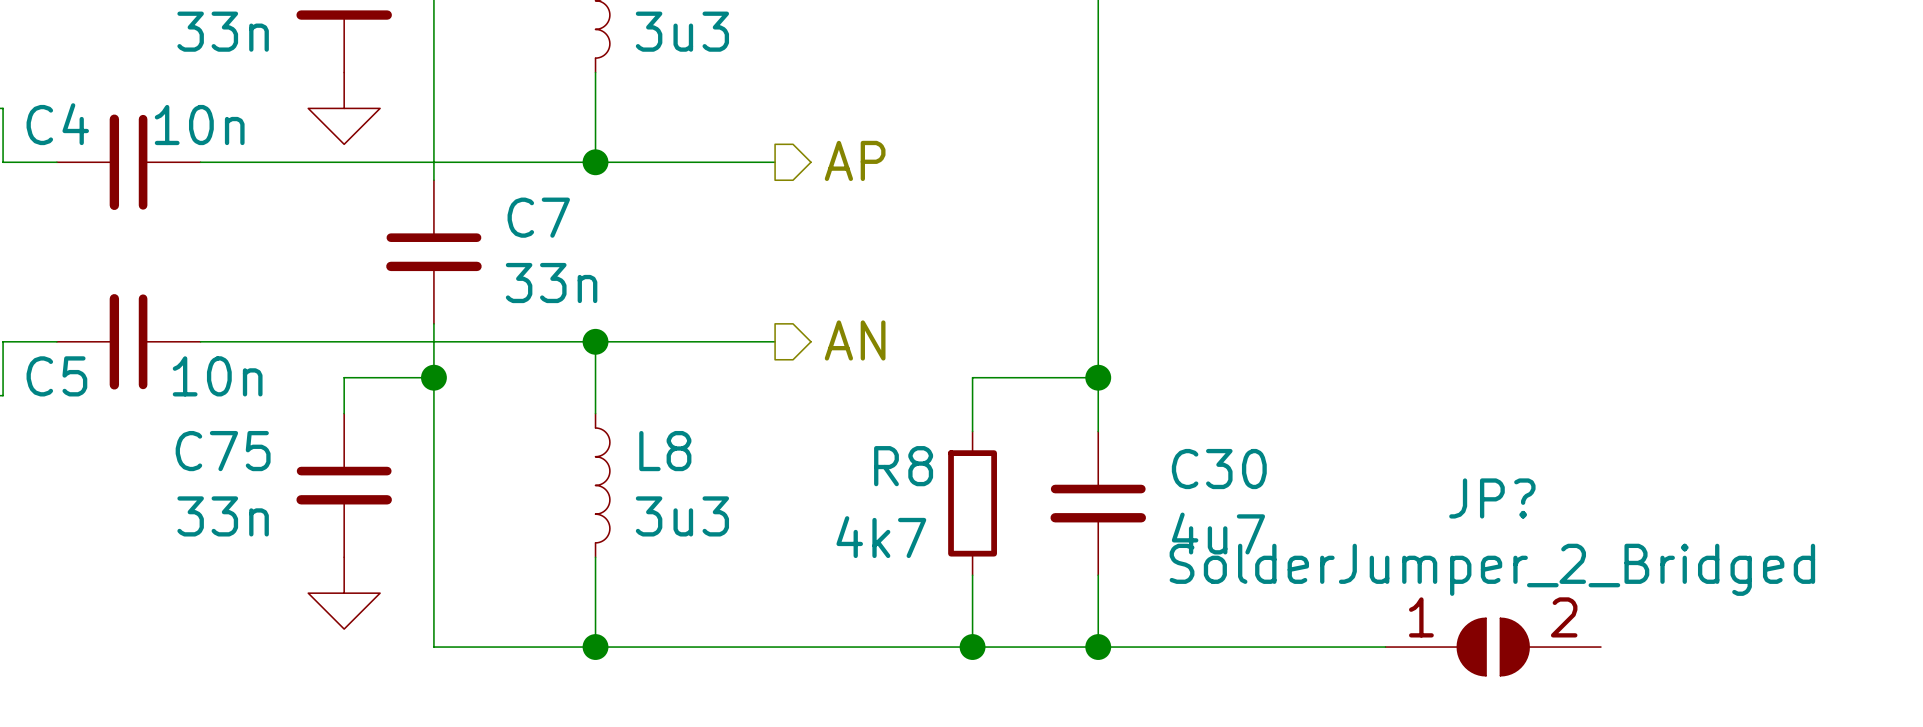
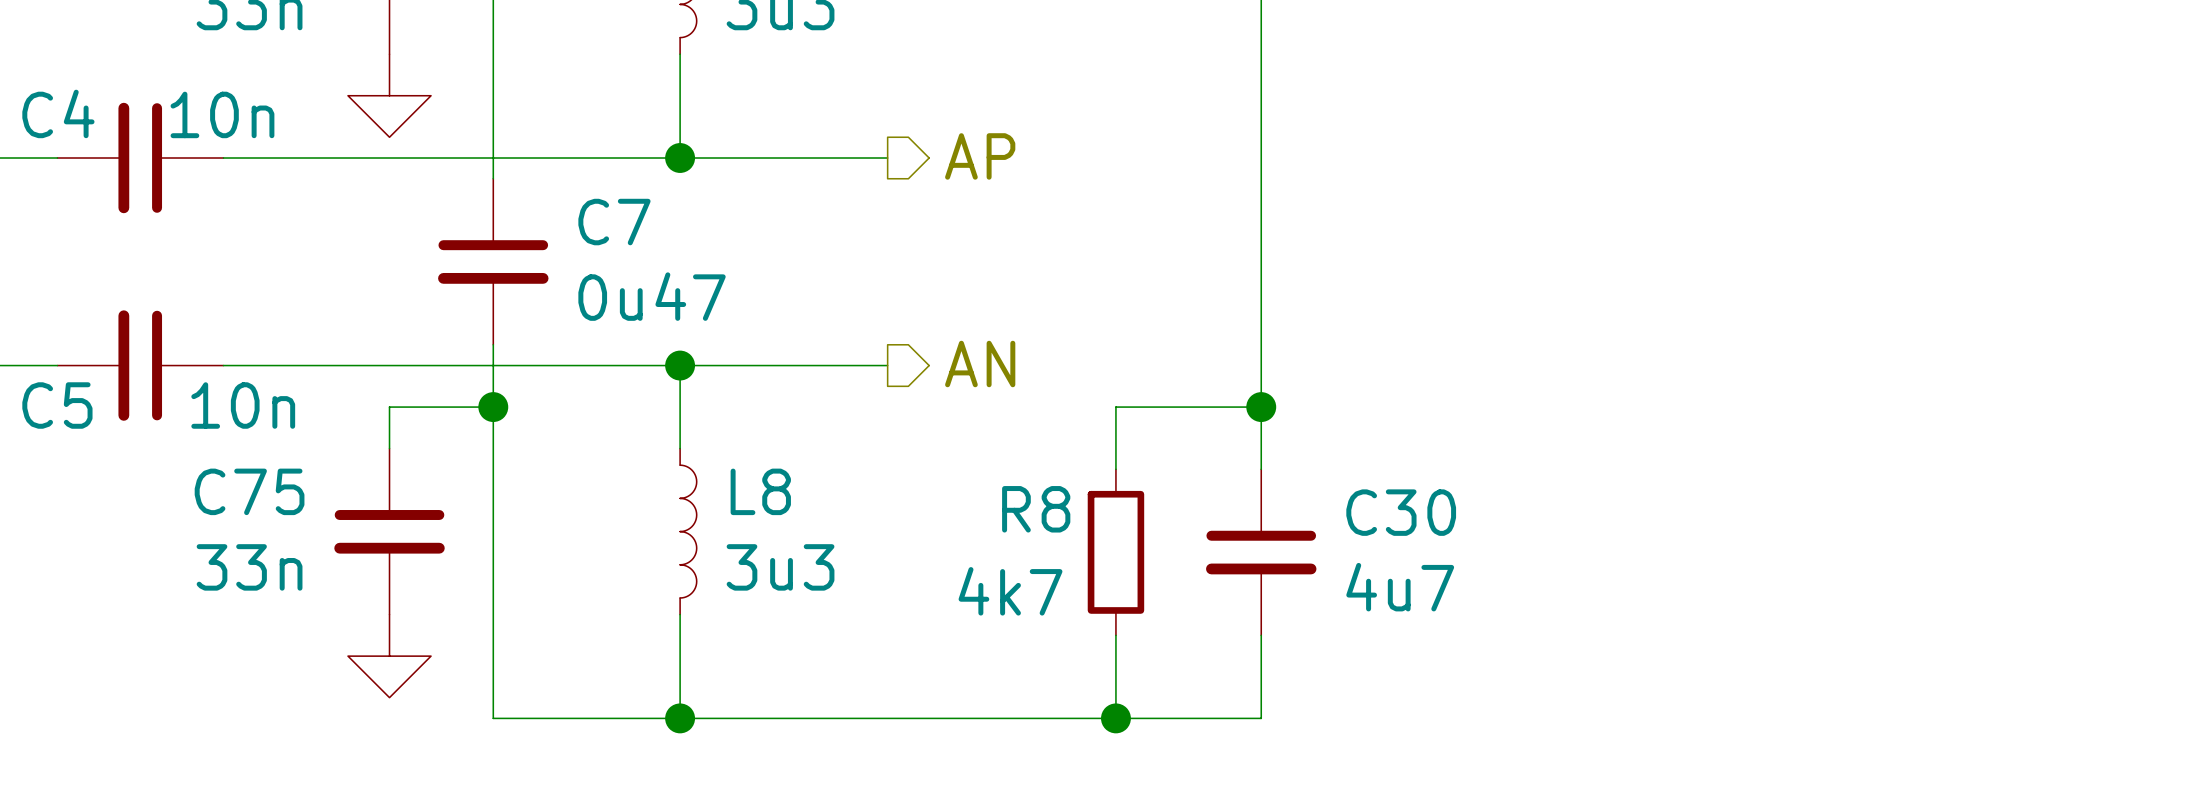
C7 value: 33n (551, 283) -> 0u47 (652, 296)
wire: (1098, 647) (1385, 647) -> none
junction: (1098, 647) -> none
JP?: SolderJumper_2_Bridged (1493, 647) -> none

